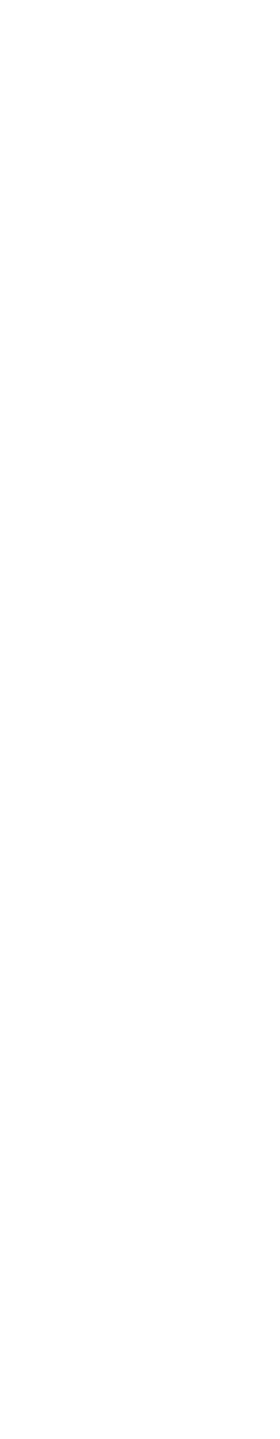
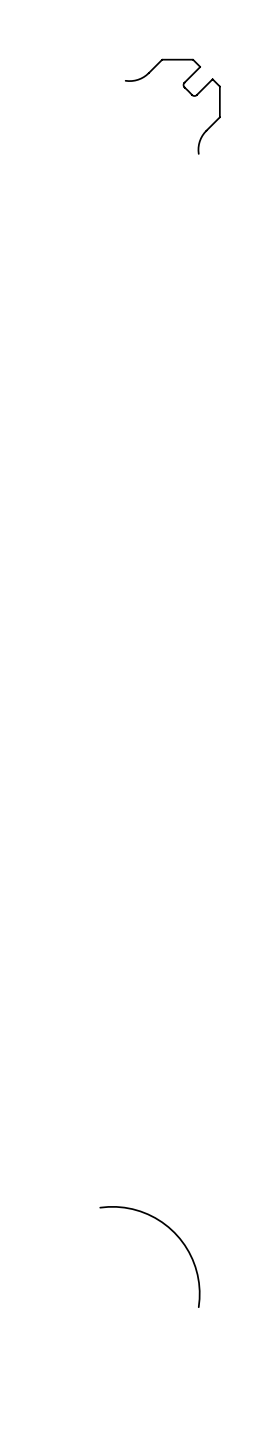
board edge: none -> (125, 80) (135, 80) (143, 77) (162, 59) (193, 59) (200, 66) (183, 85) (192, 94) (196, 95) (212, 79) (219, 86) (219, 117) (202, 135) (198, 144) (198, 153)
board edge: none -> (100, 1207) (124, 1207) (140, 1211) (162, 1222) (174, 1232) (189, 1252) (195, 1267) (199, 1291) (198, 1307)

